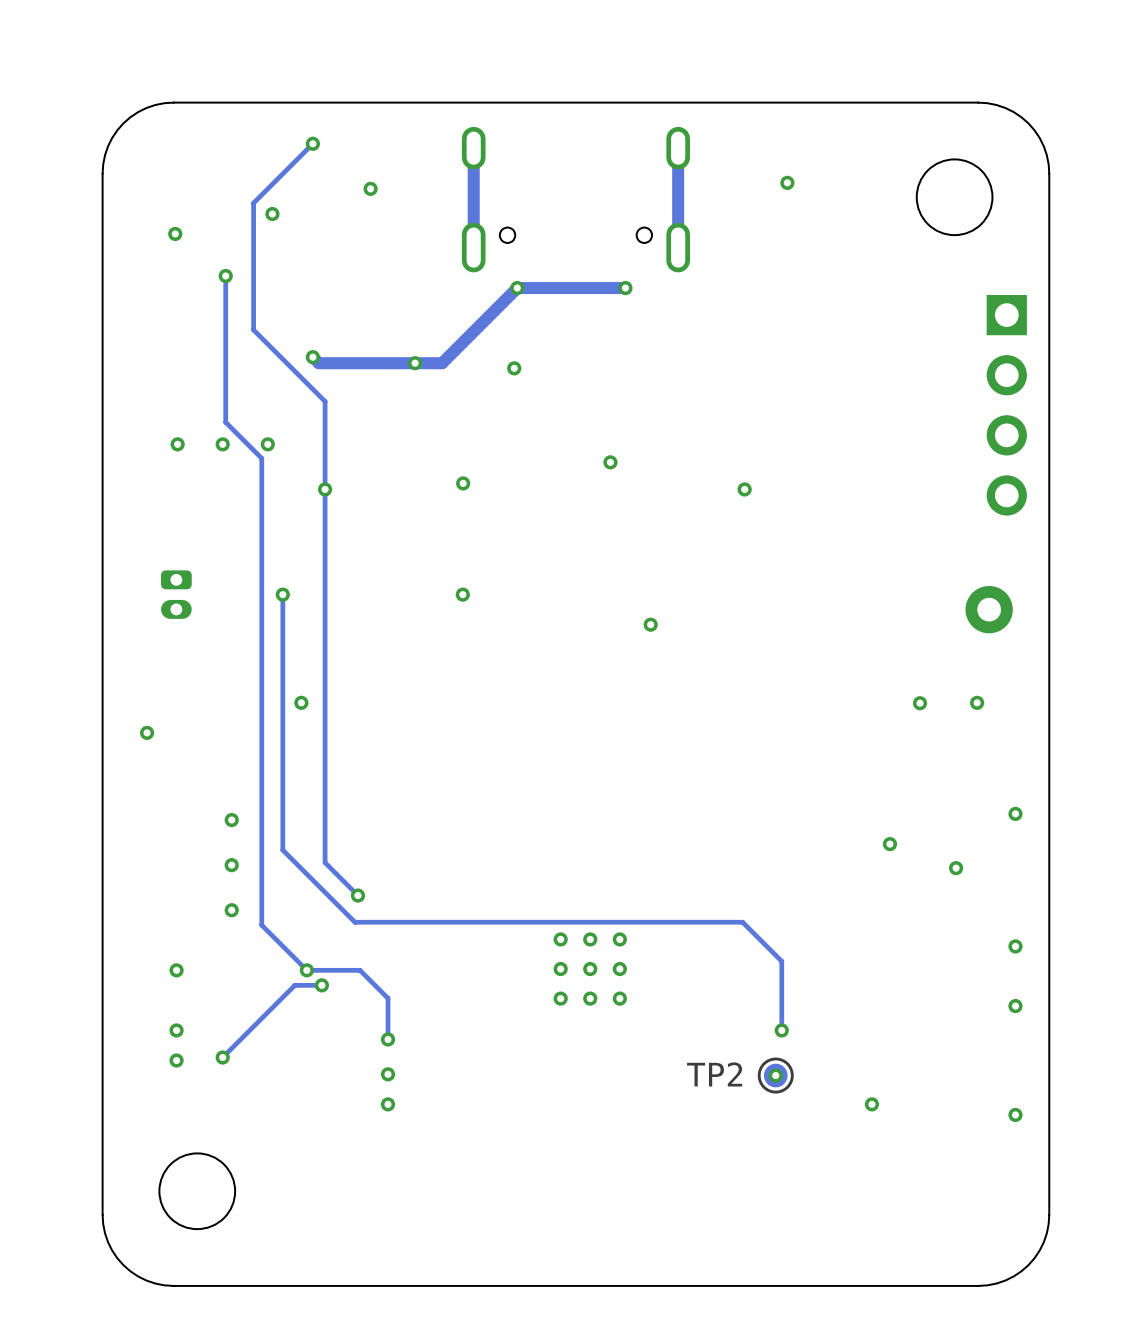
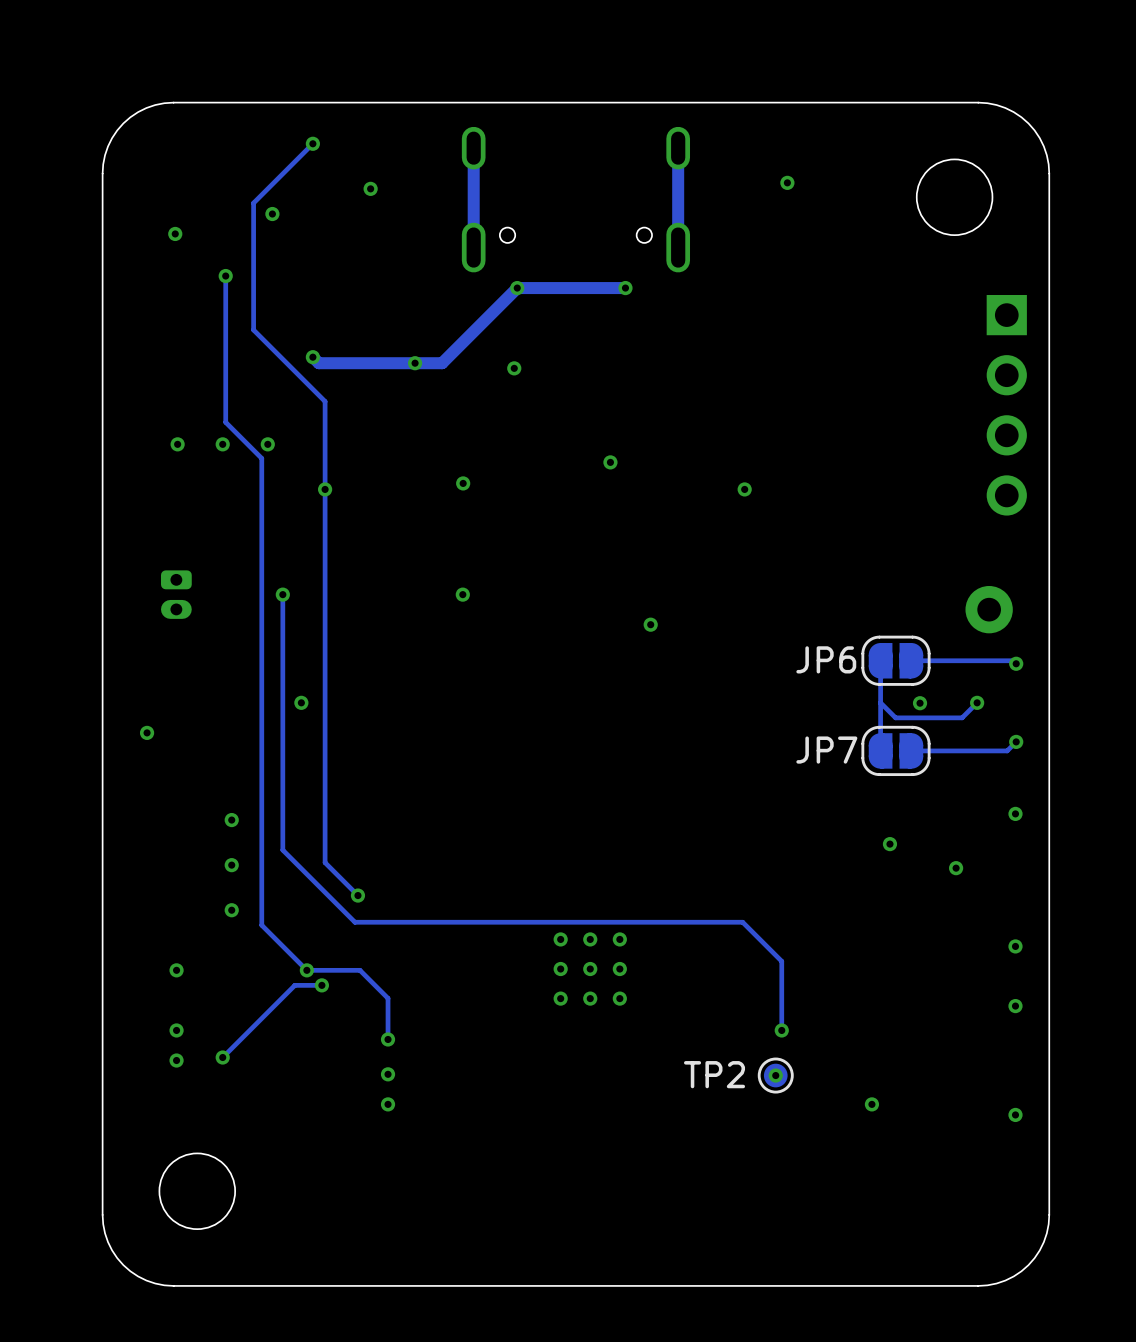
track: none -> (880, 660) (880, 750)
JP6: none -> (895, 660)
track: none -> (911, 660) (1013, 660) (1016, 663)
via: none -> (1016, 663)
track: none -> (977, 702) (962, 717) (895, 717) (880, 702)
track: none -> (1016, 741) (1007, 750) (911, 750)
via: none -> (1016, 741)
JP7: none -> (895, 750)

